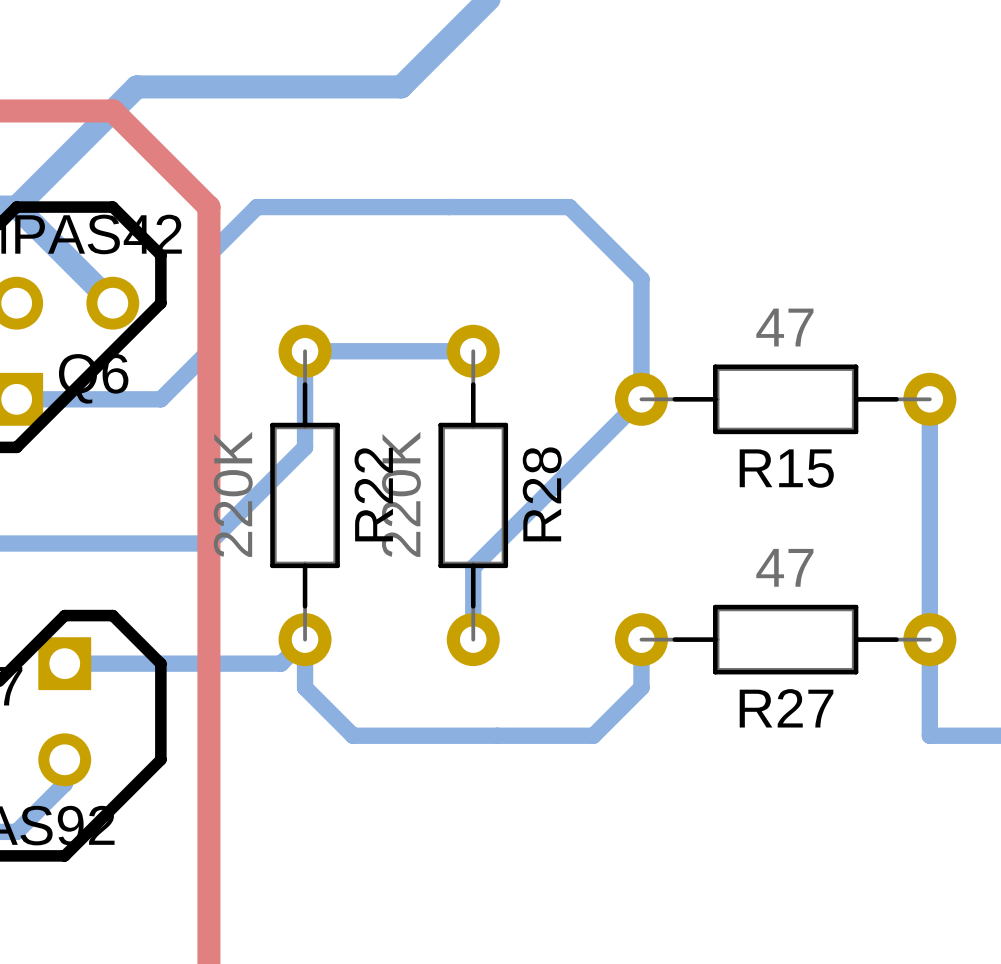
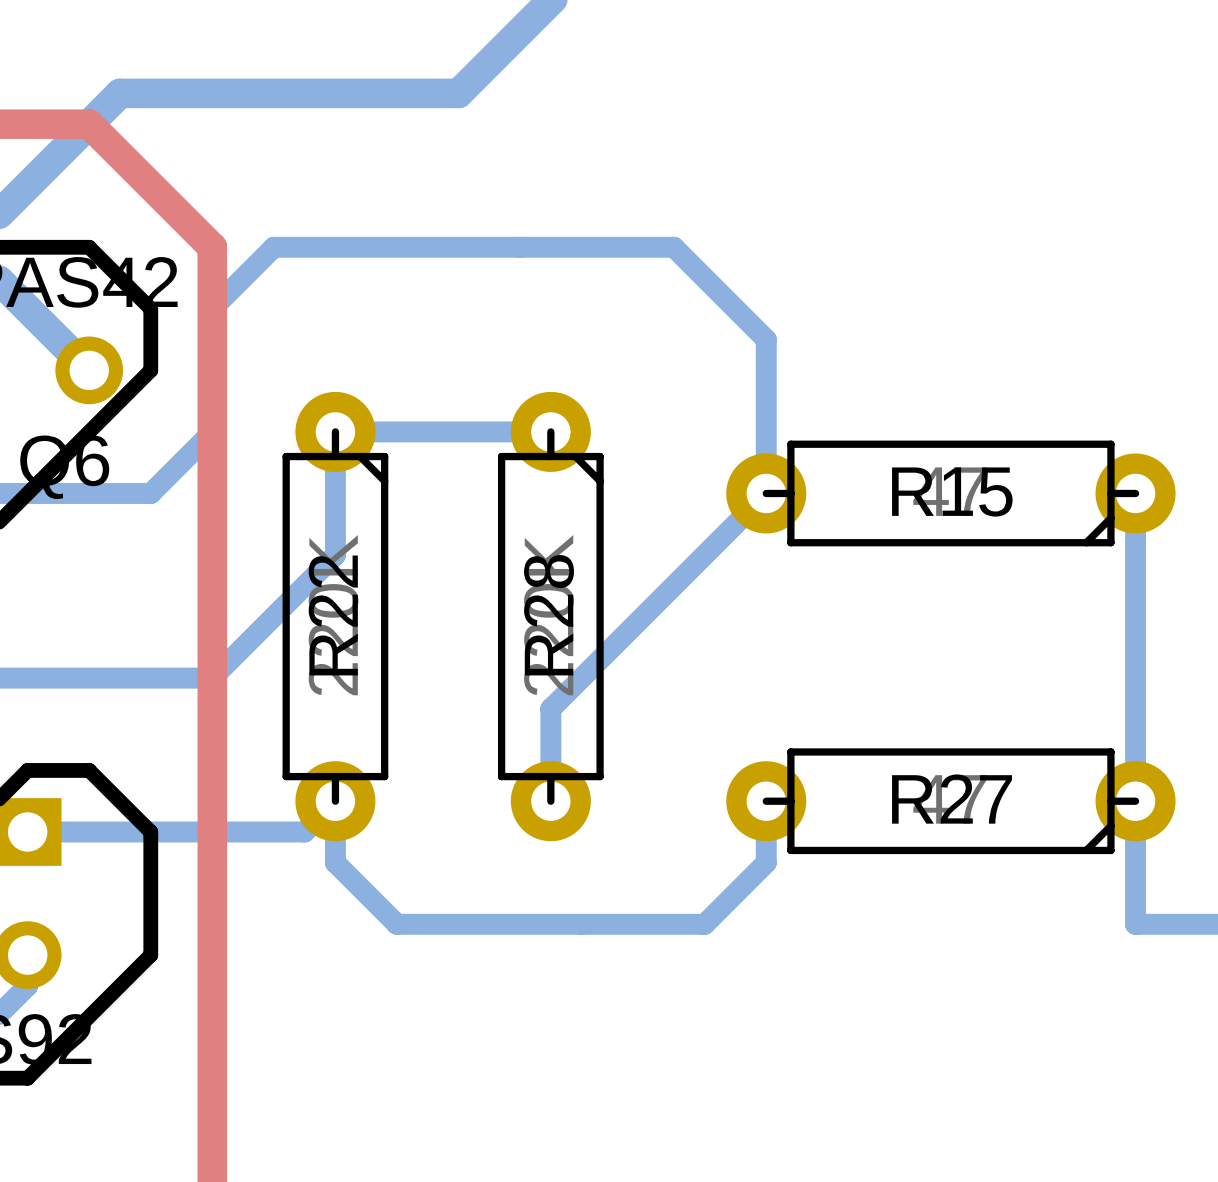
R22 footprint: [270, 324, 340, 667] -> [282, 391, 389, 842]
R28 footprint: [438, 324, 509, 667] -> [497, 391, 604, 842]
R15 footprint: [614, 364, 957, 435] -> [726, 440, 1176, 547]
R27 footprint: [614, 604, 957, 675] -> [726, 748, 1176, 855]

